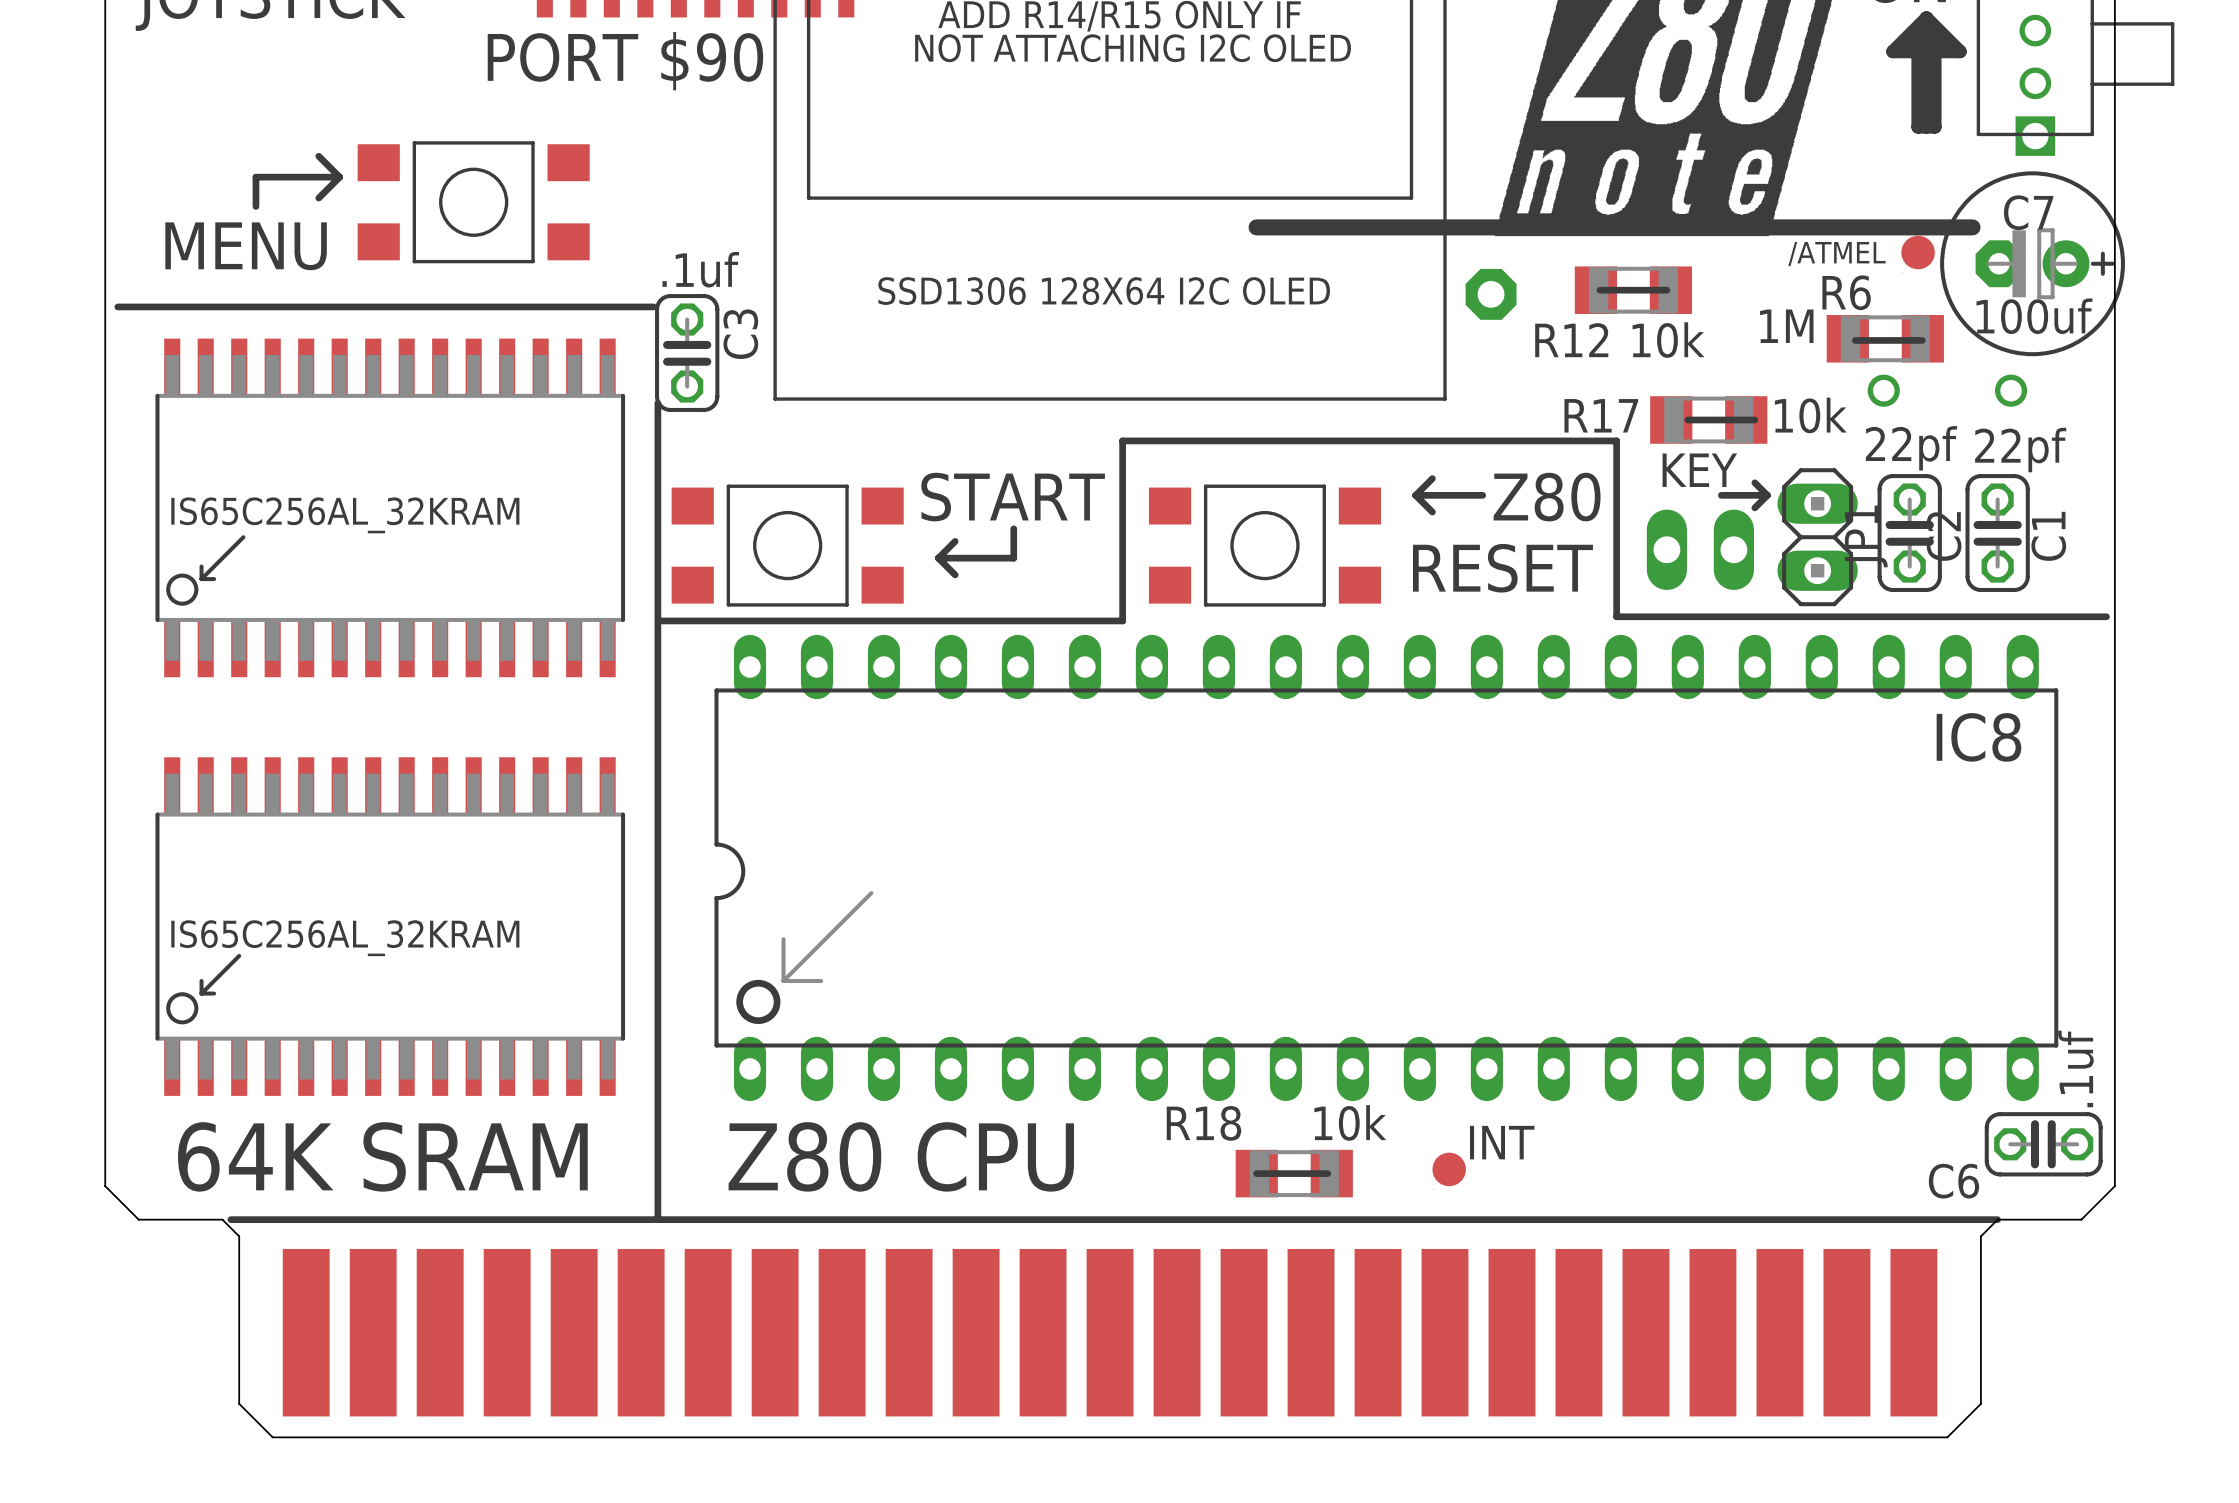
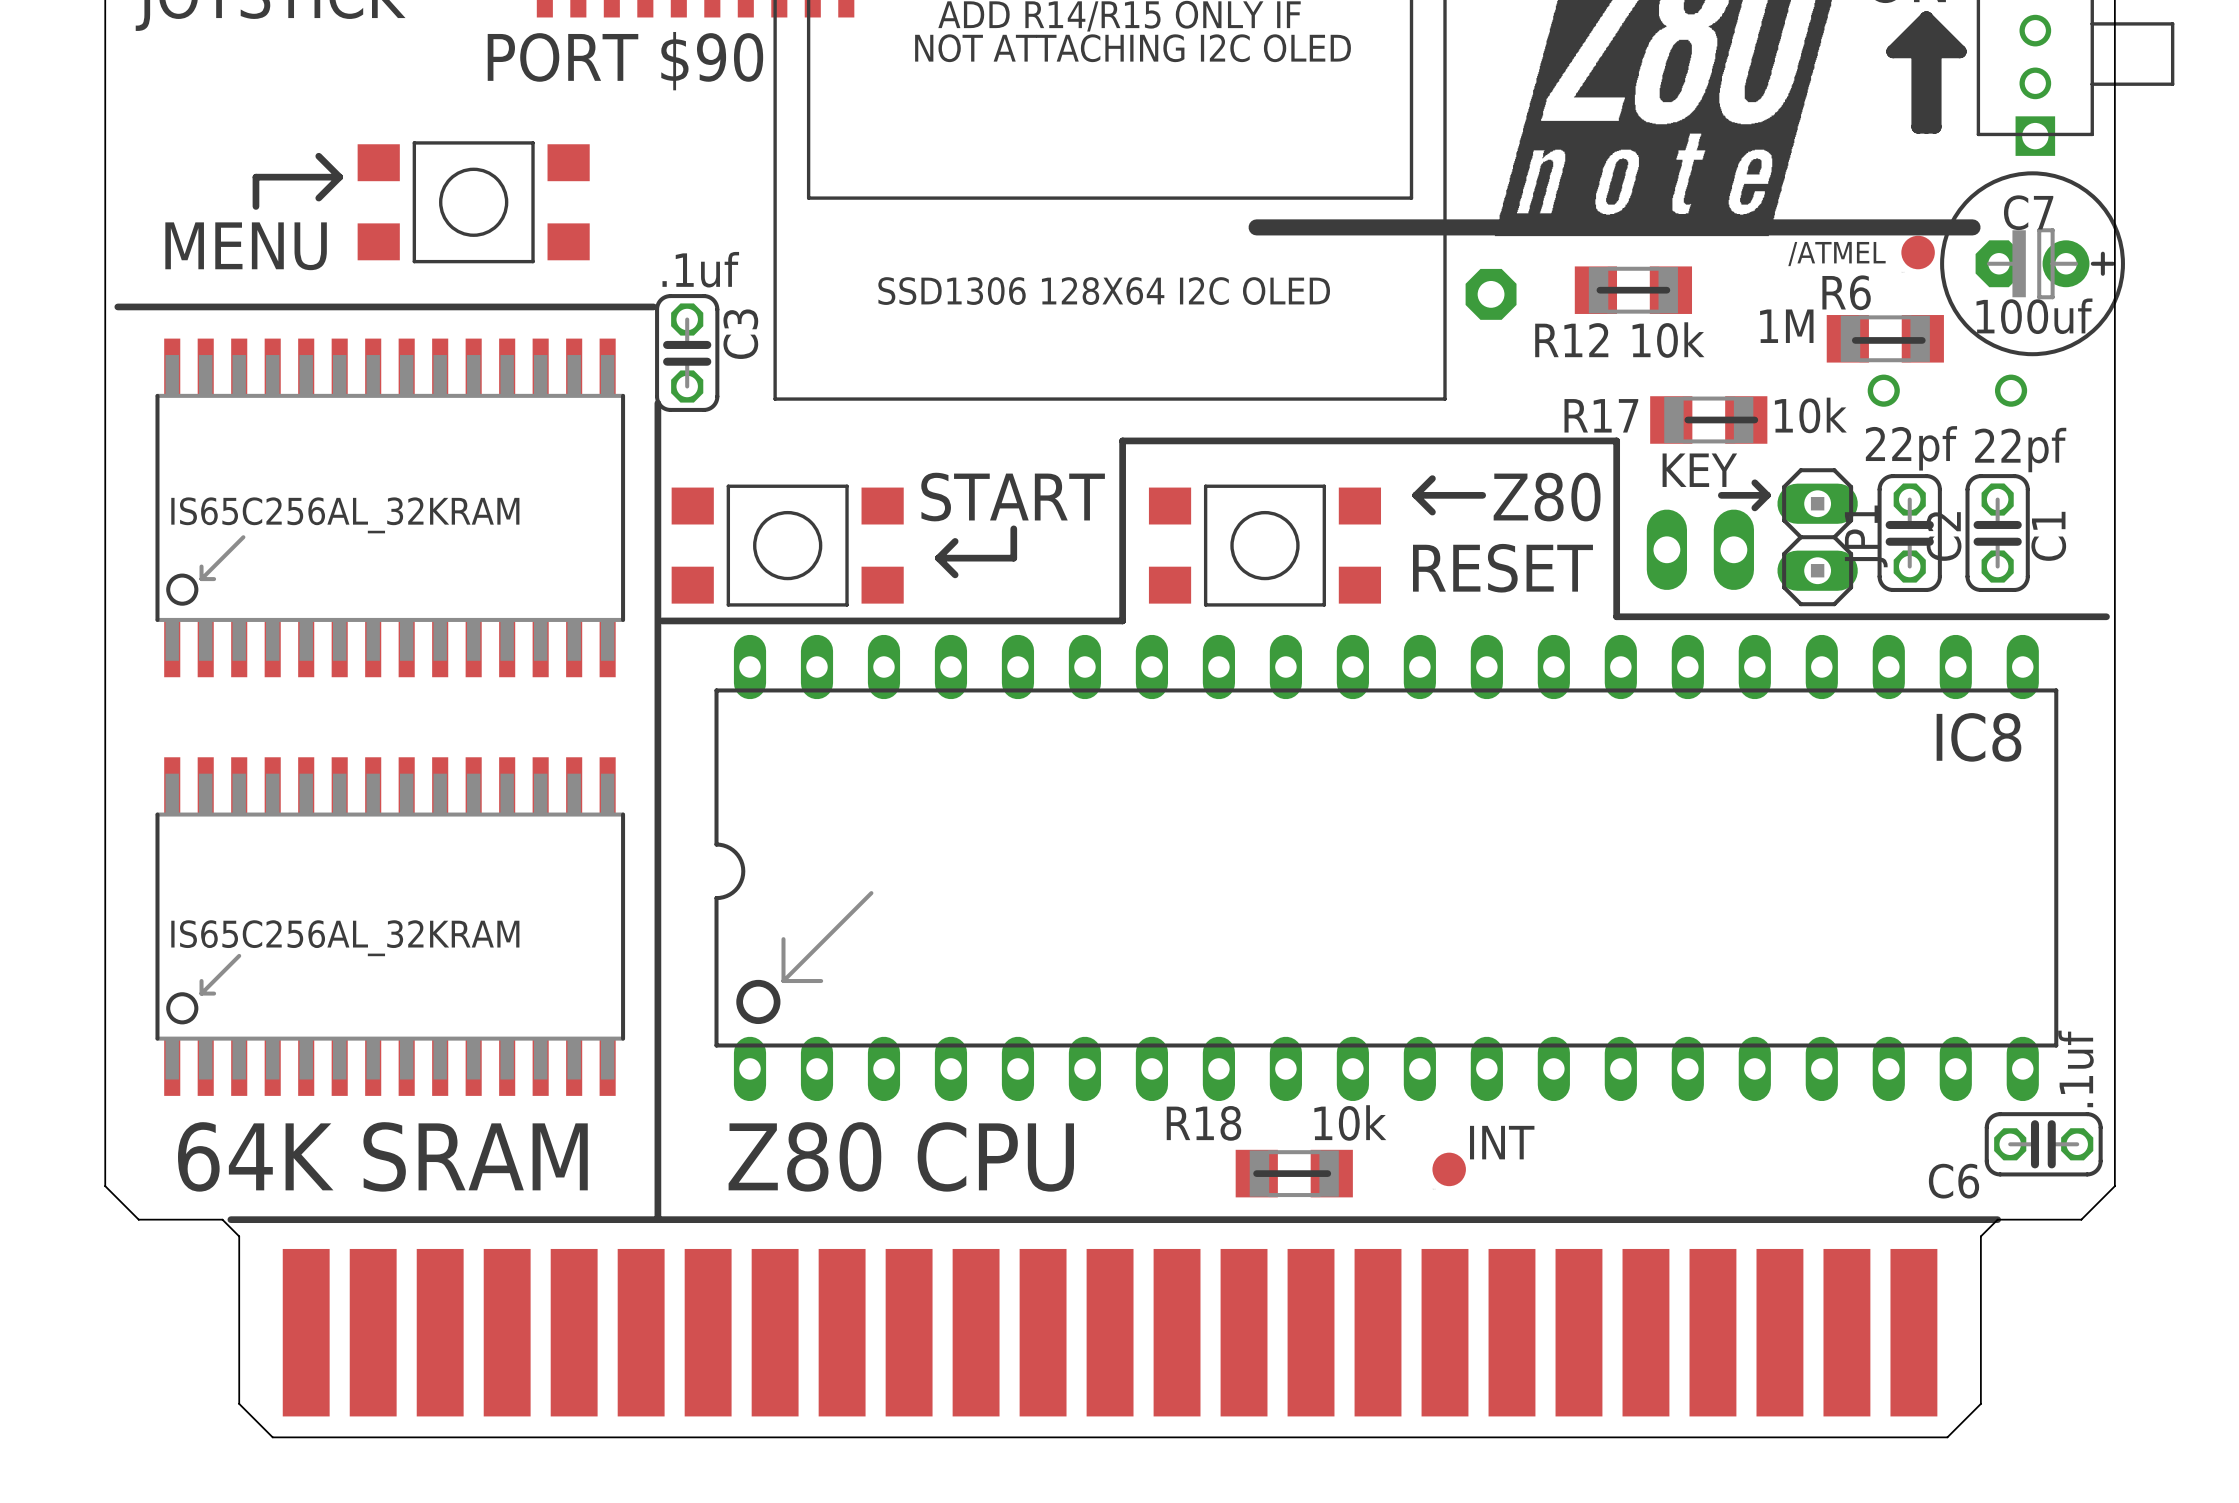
line: (243, 537) (201, 579) -> none
line: none -> (243, 537) (201, 579)
line: (201, 566) (201, 579) -> none
line: none -> (201, 566) (201, 579)
line: (201, 579) (214, 579) -> none
line: none -> (201, 579) (214, 579)
line: (239, 955) (201, 993) -> none
line: none -> (239, 955) (201, 993)
line: (201, 981) (201, 993) -> none
line: none -> (201, 981) (201, 993)
line: (201, 993) (214, 993) -> none
line: none -> (201, 993) (214, 993)

